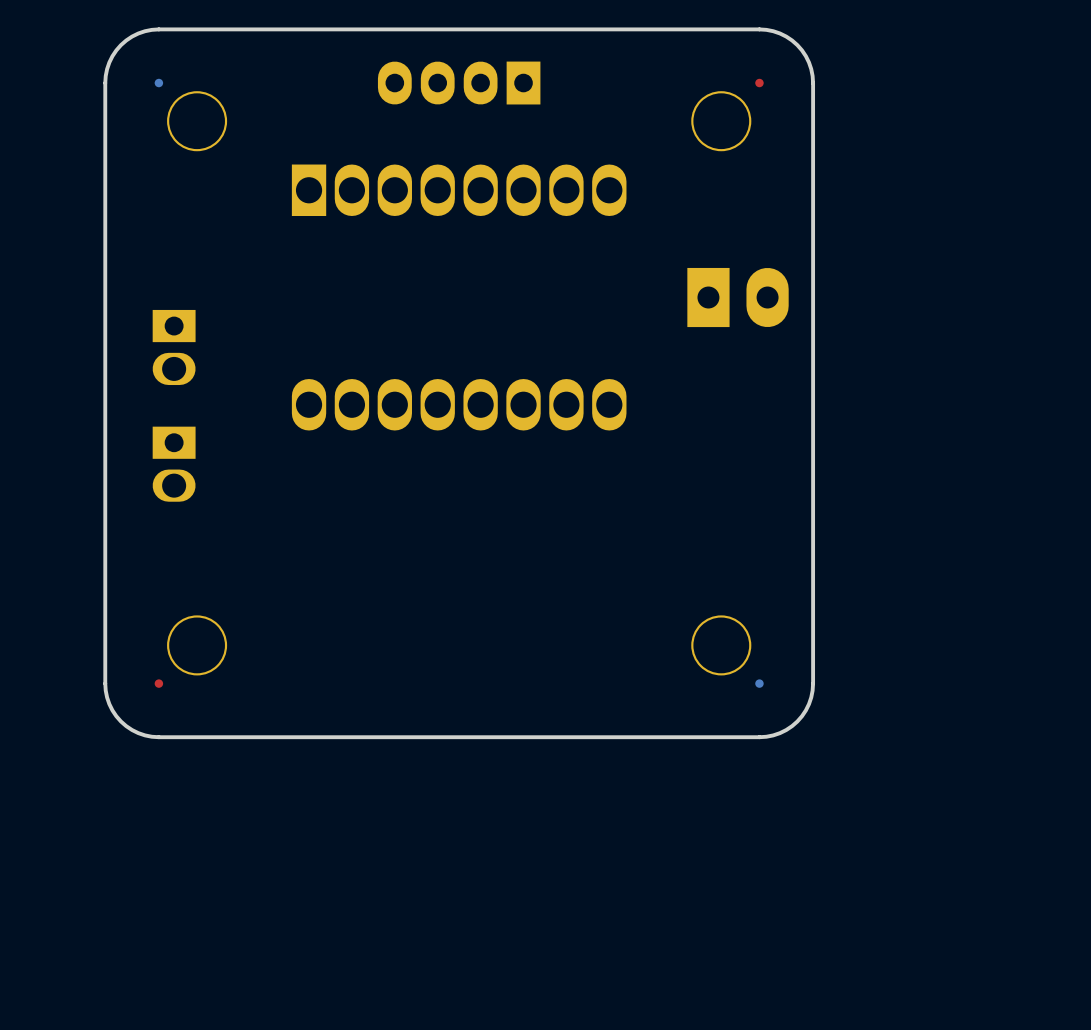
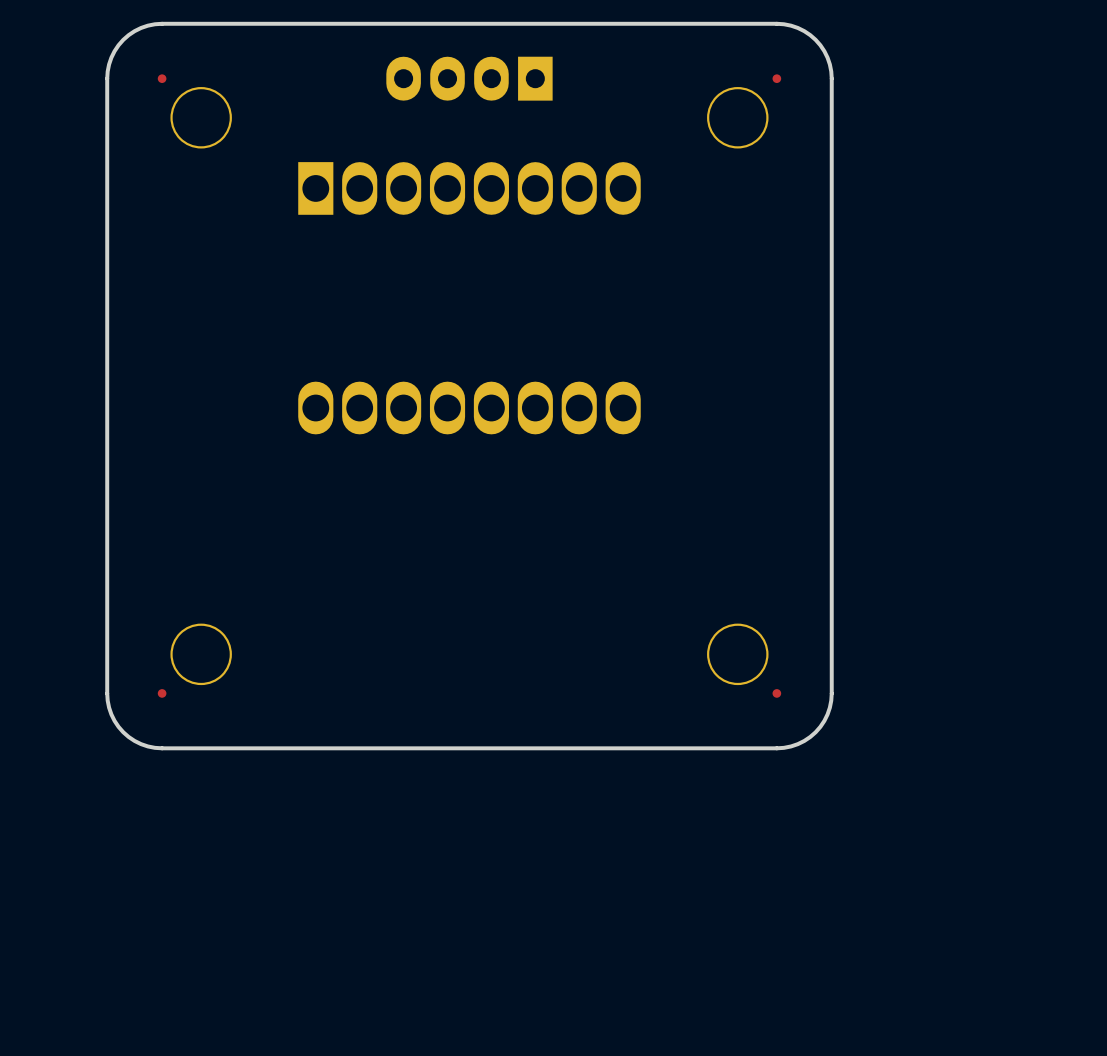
part side: bottom (158, 83) -> top (162, 78)
part: (738, 297) -> none
part: (174, 347) -> none
part: (174, 464) -> none
part side: bottom (759, 683) -> top (776, 693)

